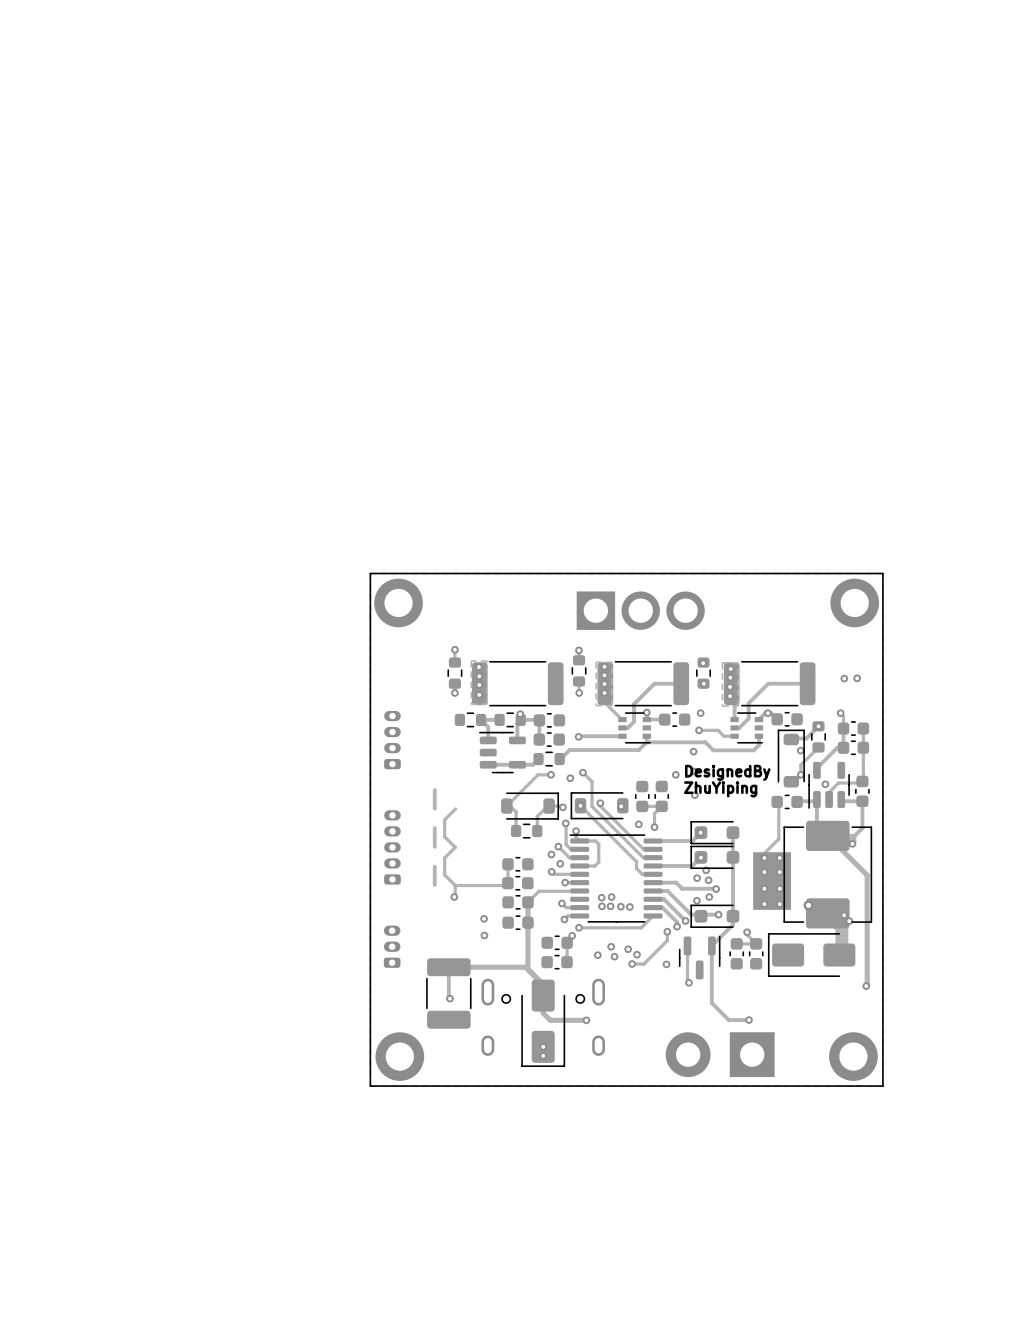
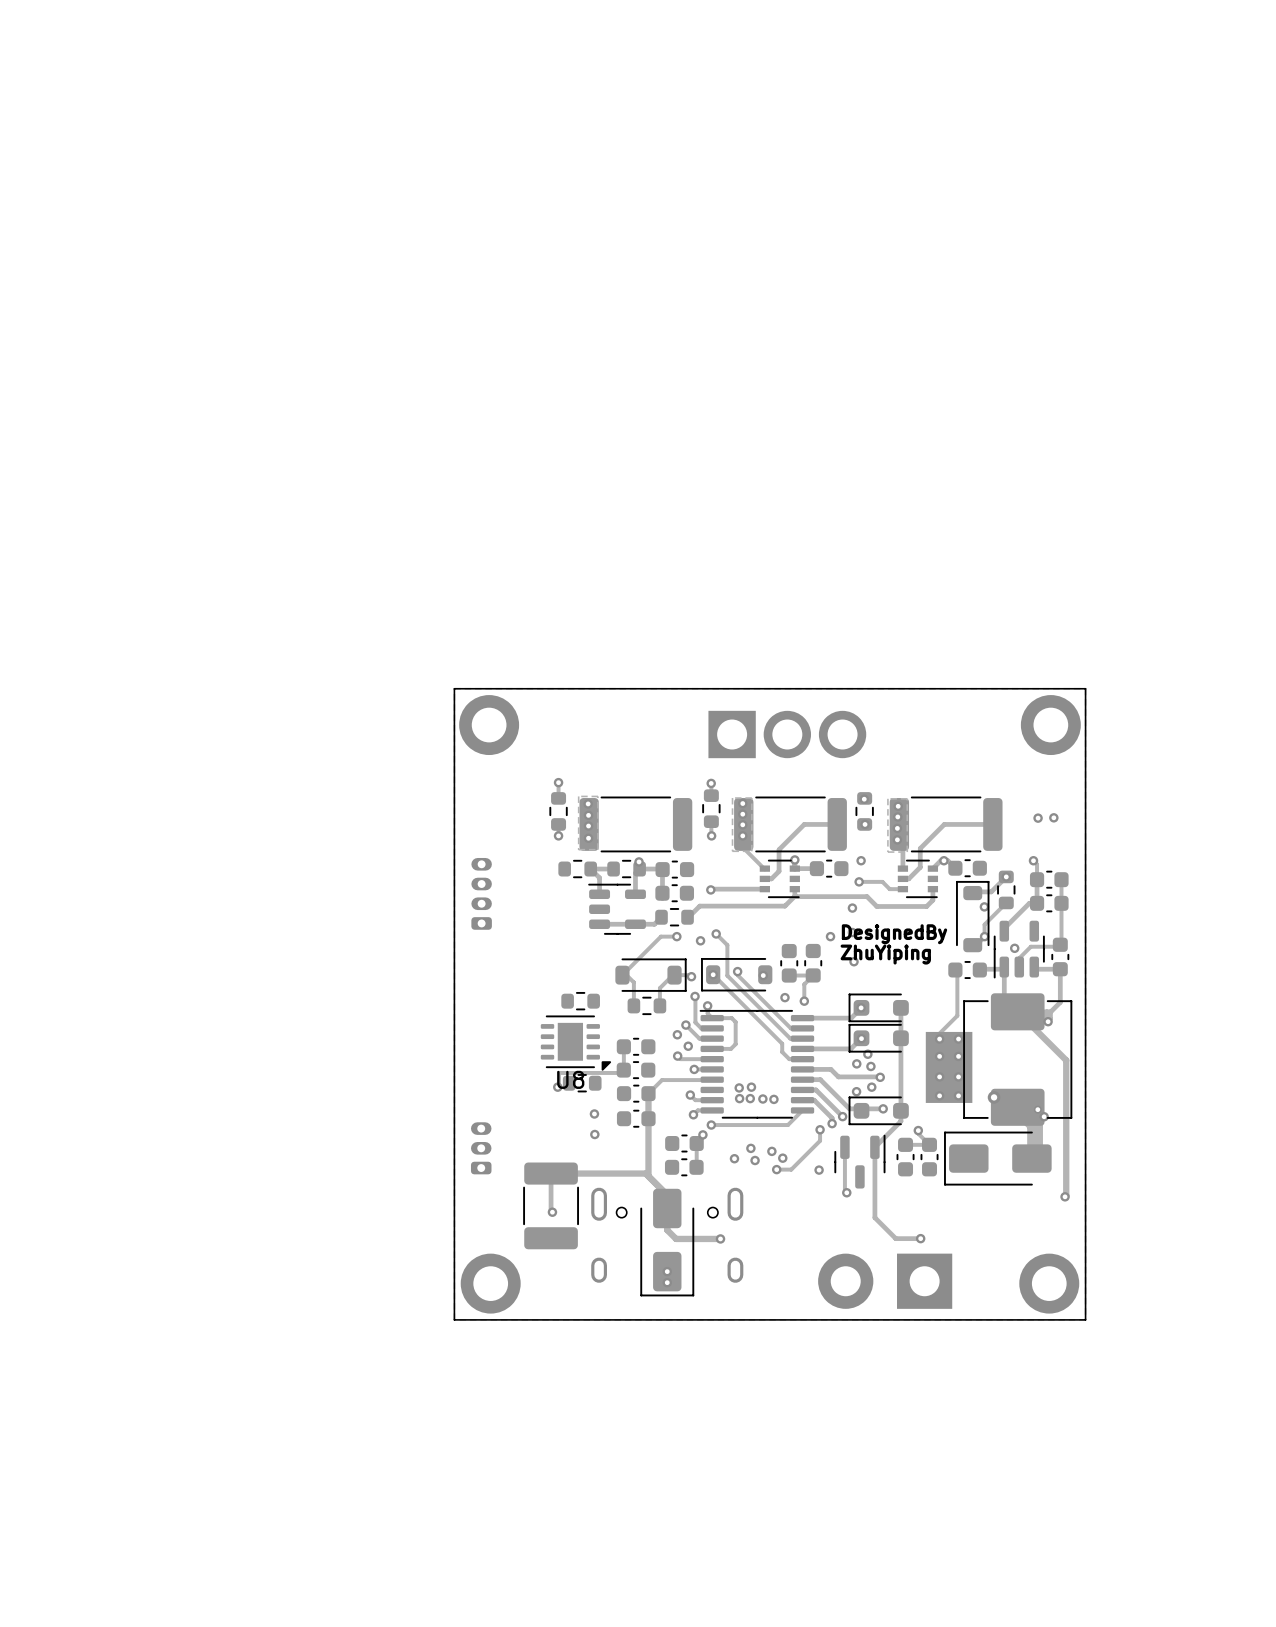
track: (434, 790) (434, 808) -> none
track: (455, 808) (444, 819) (444, 836) (455, 847) (444, 857) (444, 874) (455, 885) -> none
part: none -> (580, 1001)
track: (434, 828) (434, 846) -> none
part: (392, 847) -> none
U8: none -> (575, 1043)
track: (434, 866) (434, 884) -> none
part: none -> (582, 1083)

